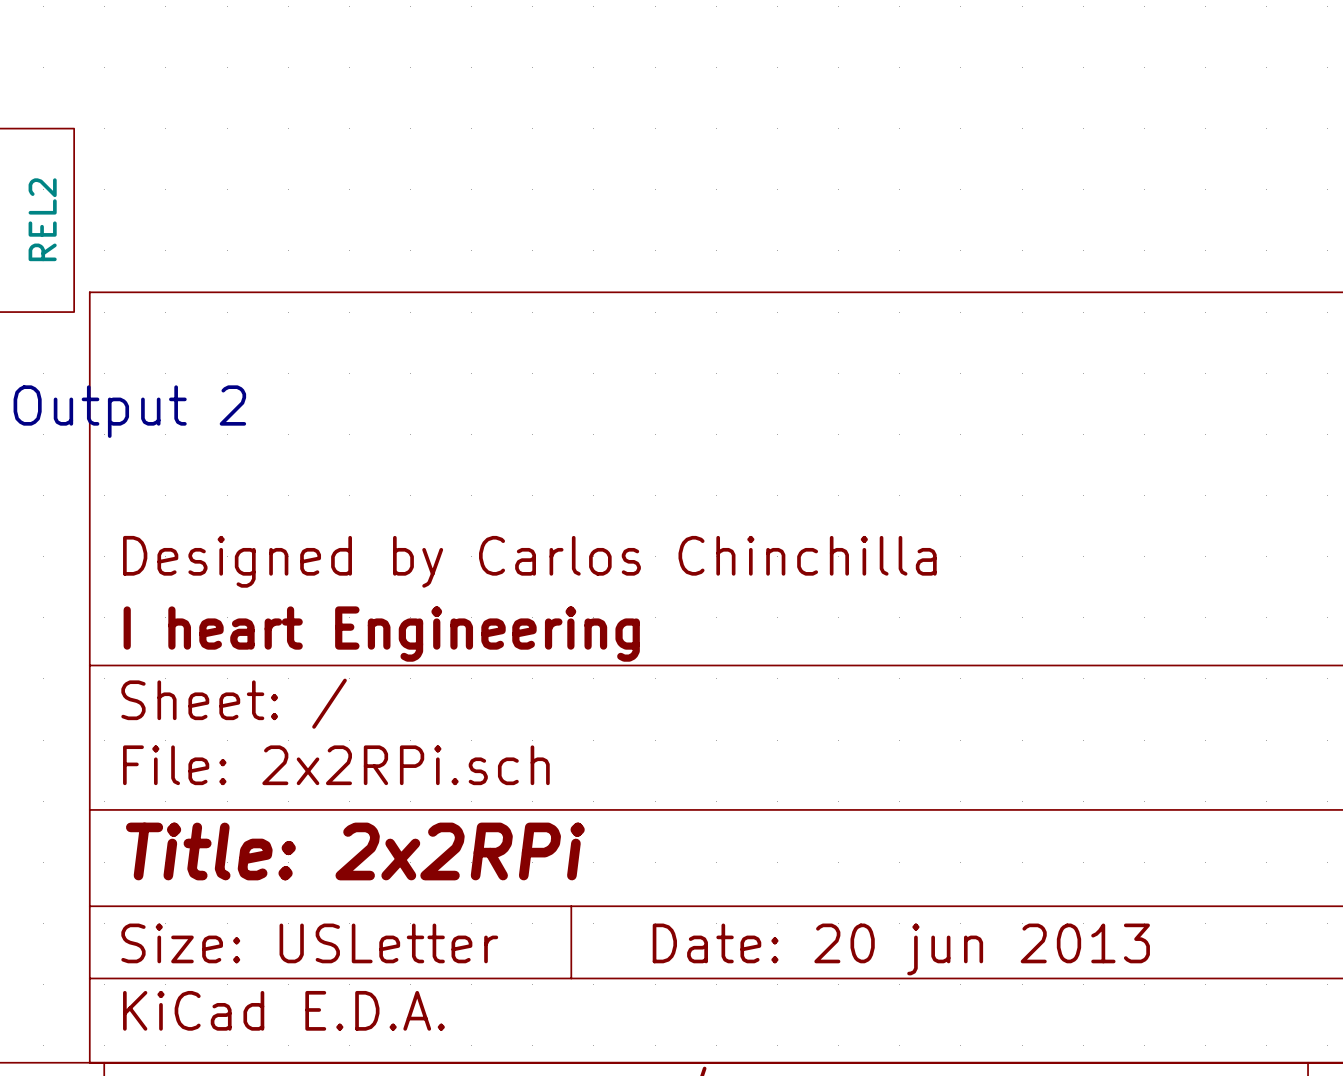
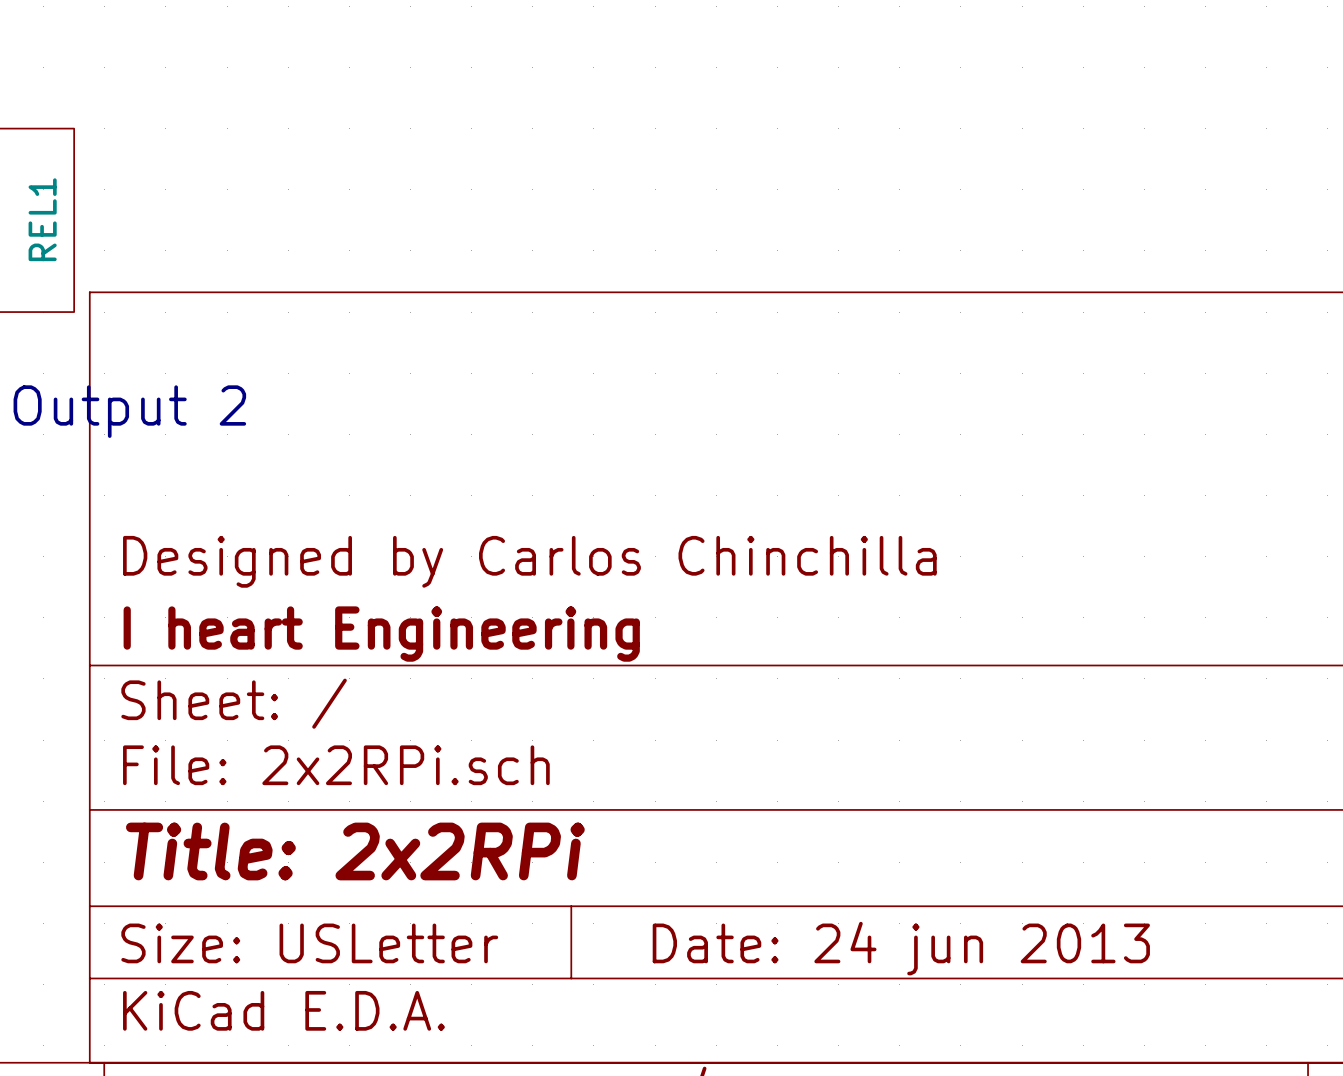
part value: REL2 (42, 219) -> REL1 (42, 219)
title block: Date: 20 jun 2013 (901, 949) -> Date: 24 jun 2013 (901, 948)

